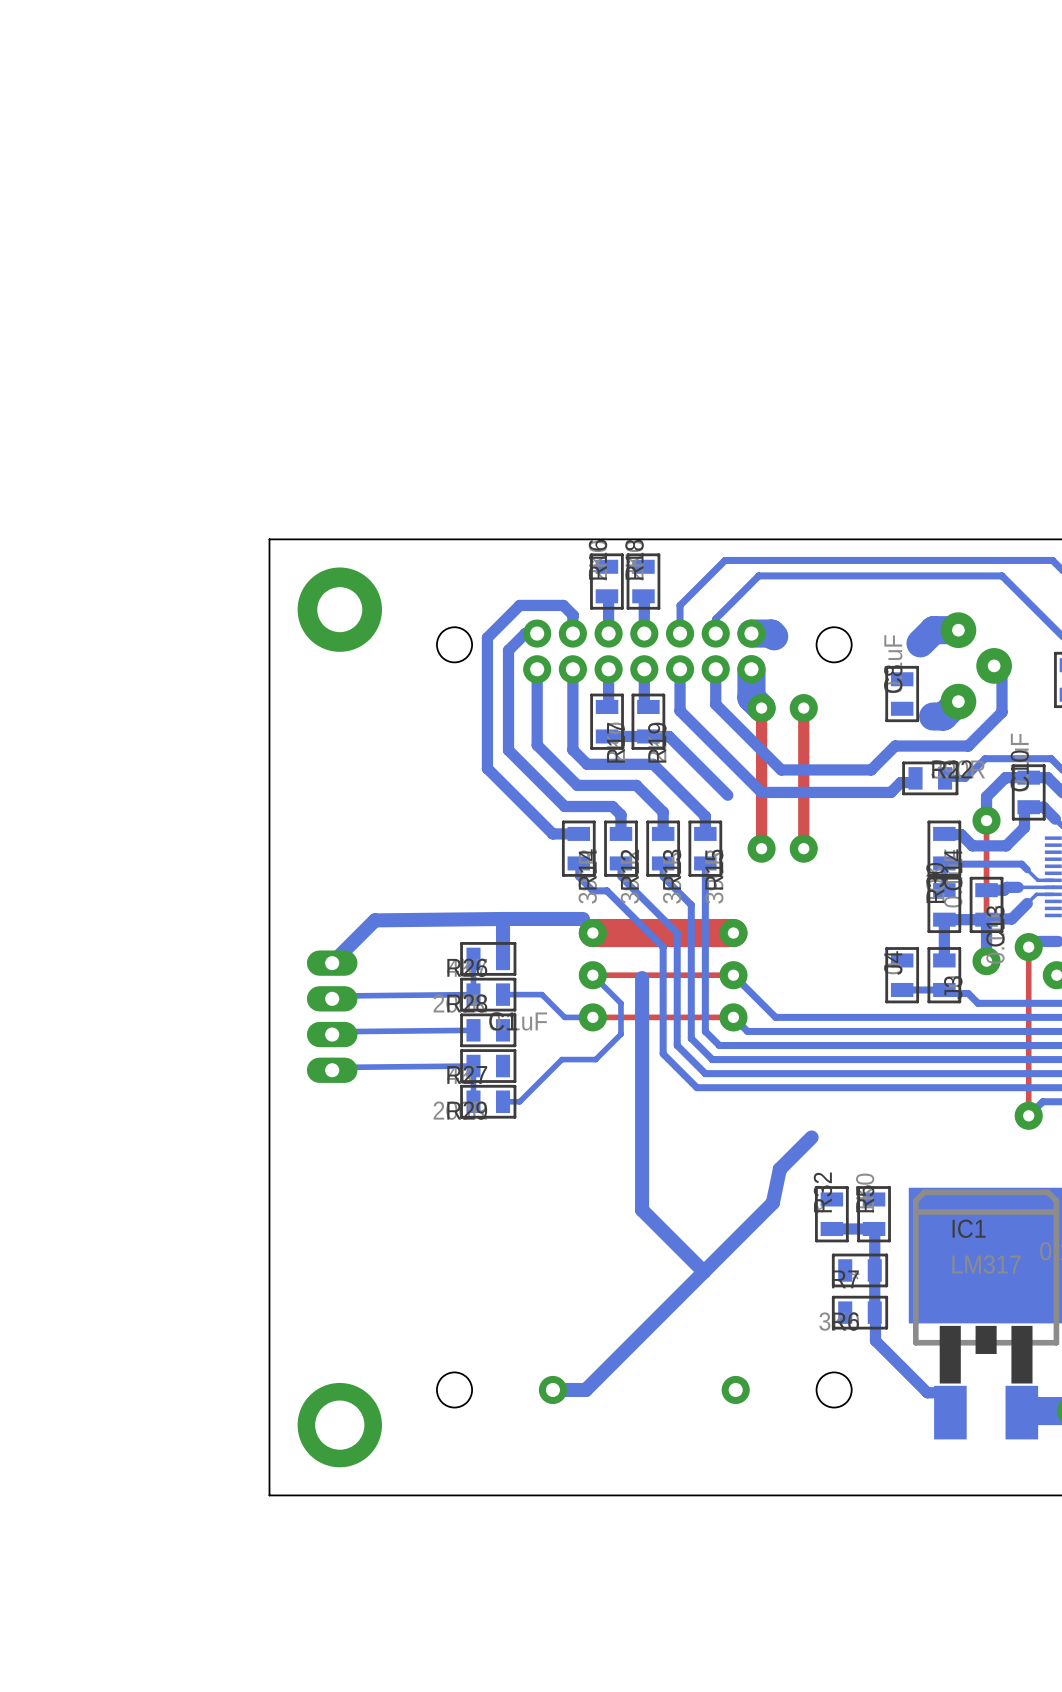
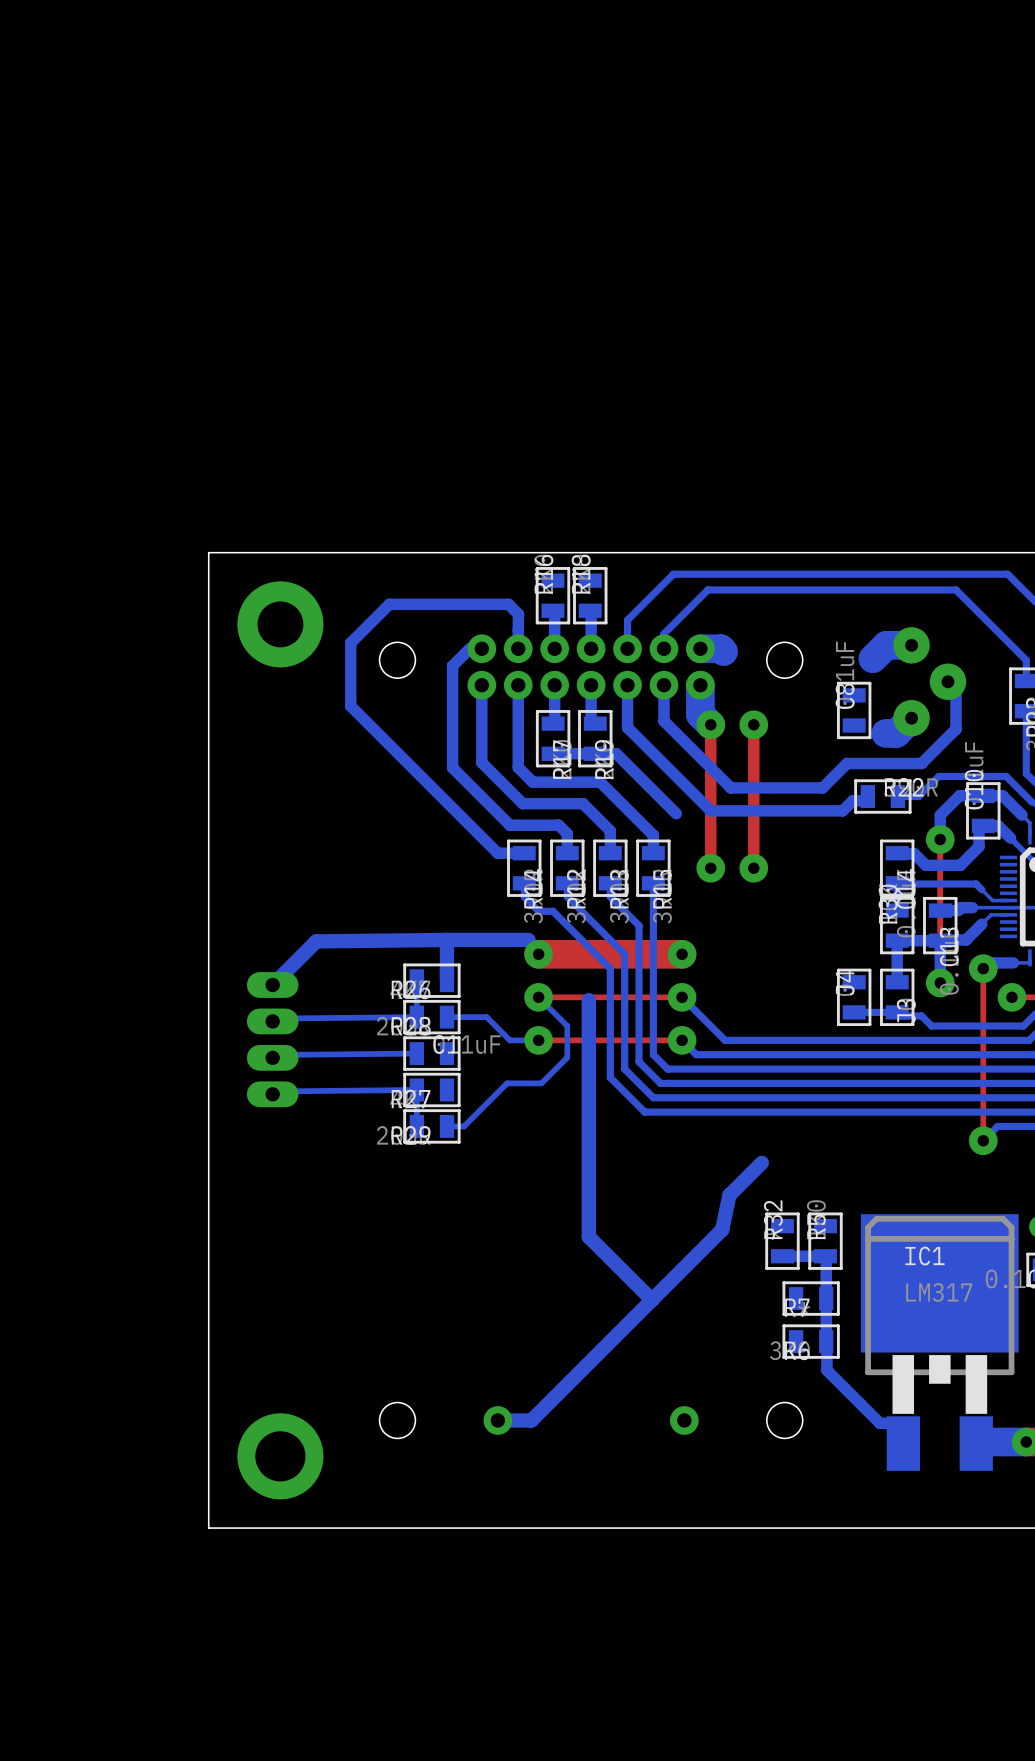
bottom track: (572, 615) (563, 605) (519, 605) (487, 637) (487, 768) -> (518, 630) (518, 614) (508, 604) (389, 604) (350, 643) (350, 706) (431, 786)

